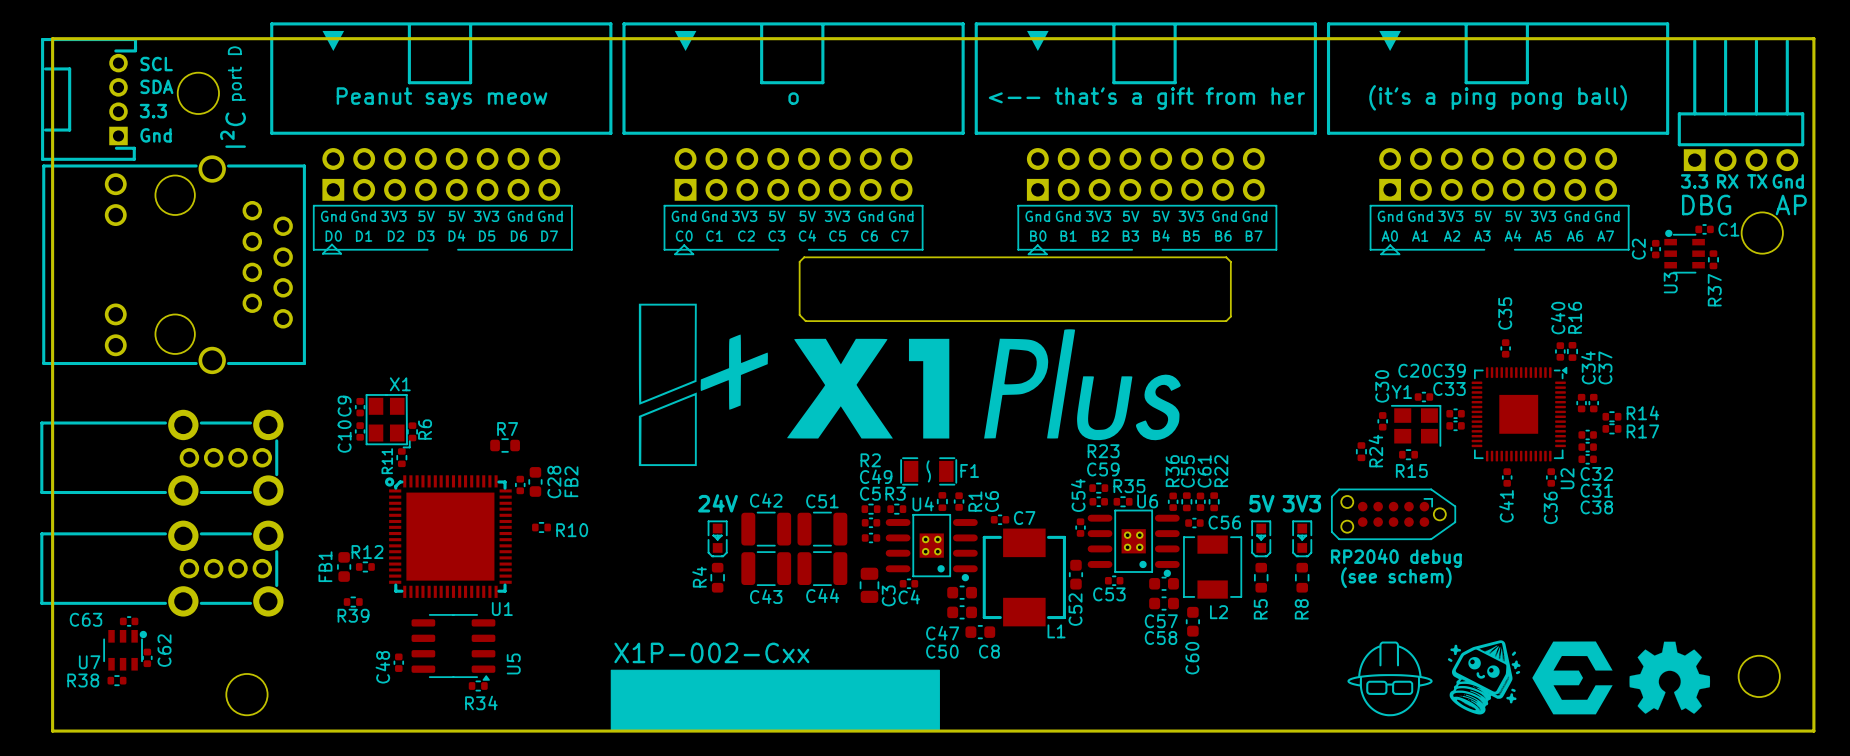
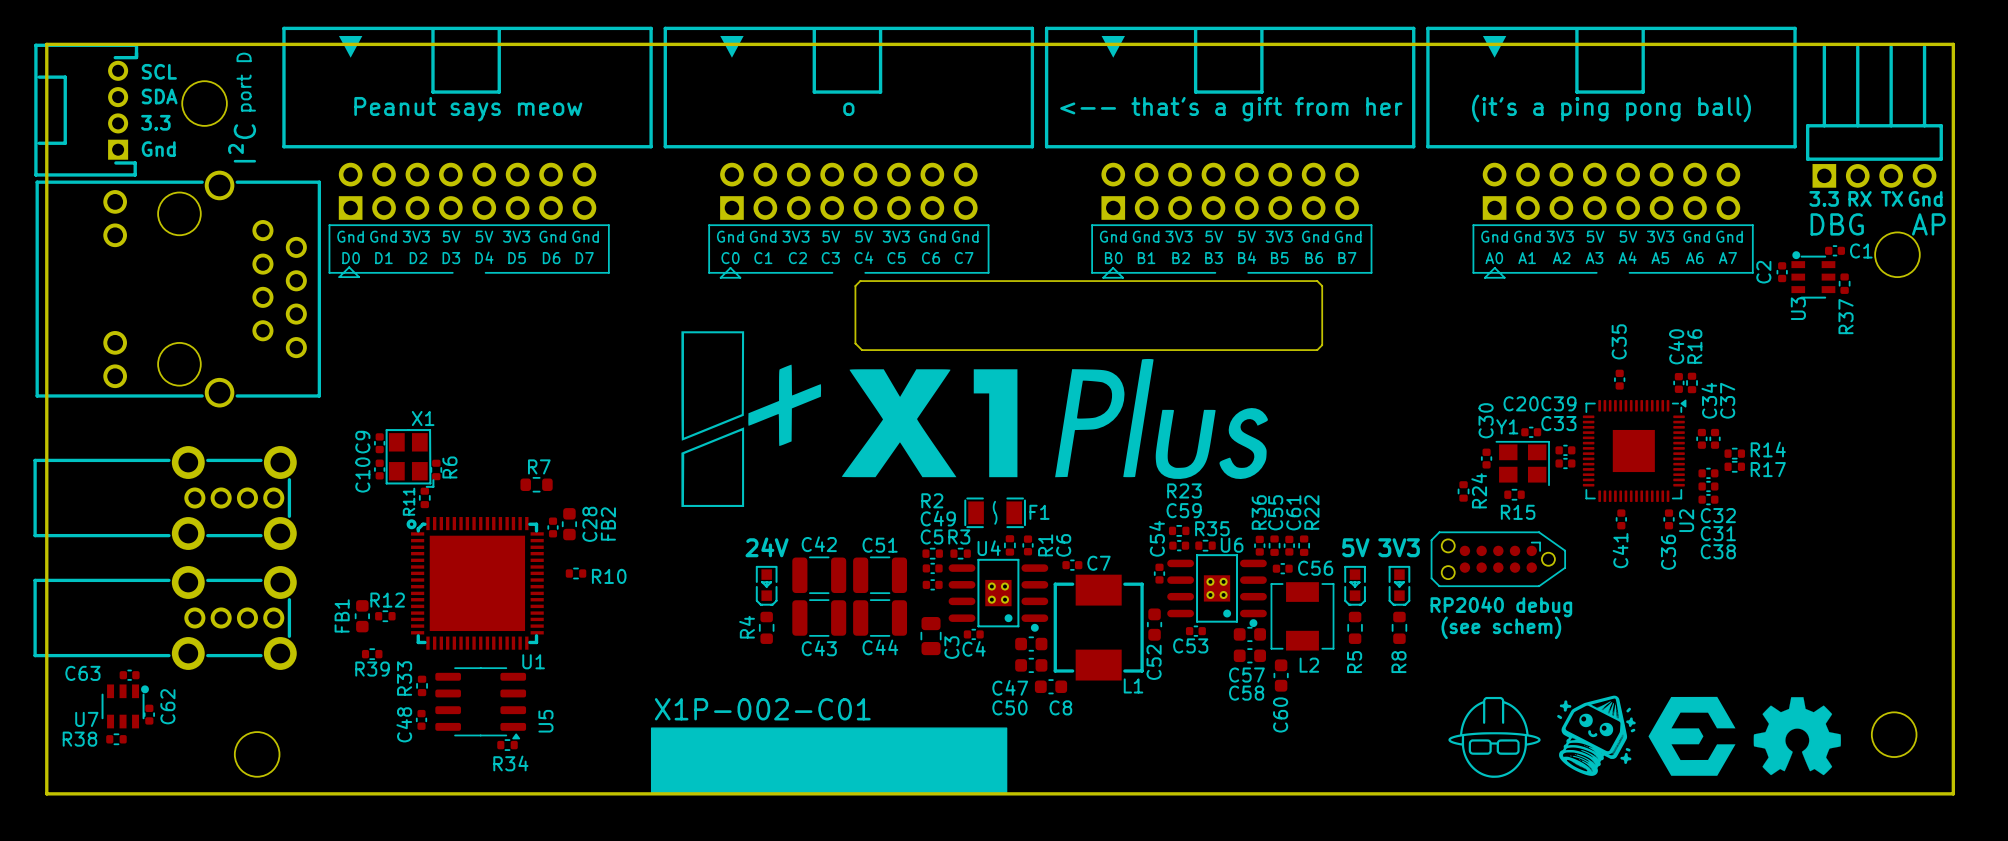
R33: none -> (422, 685)
text: X1P-002-Cxx (711, 652) -> X1P-002-C01 (762, 709)

